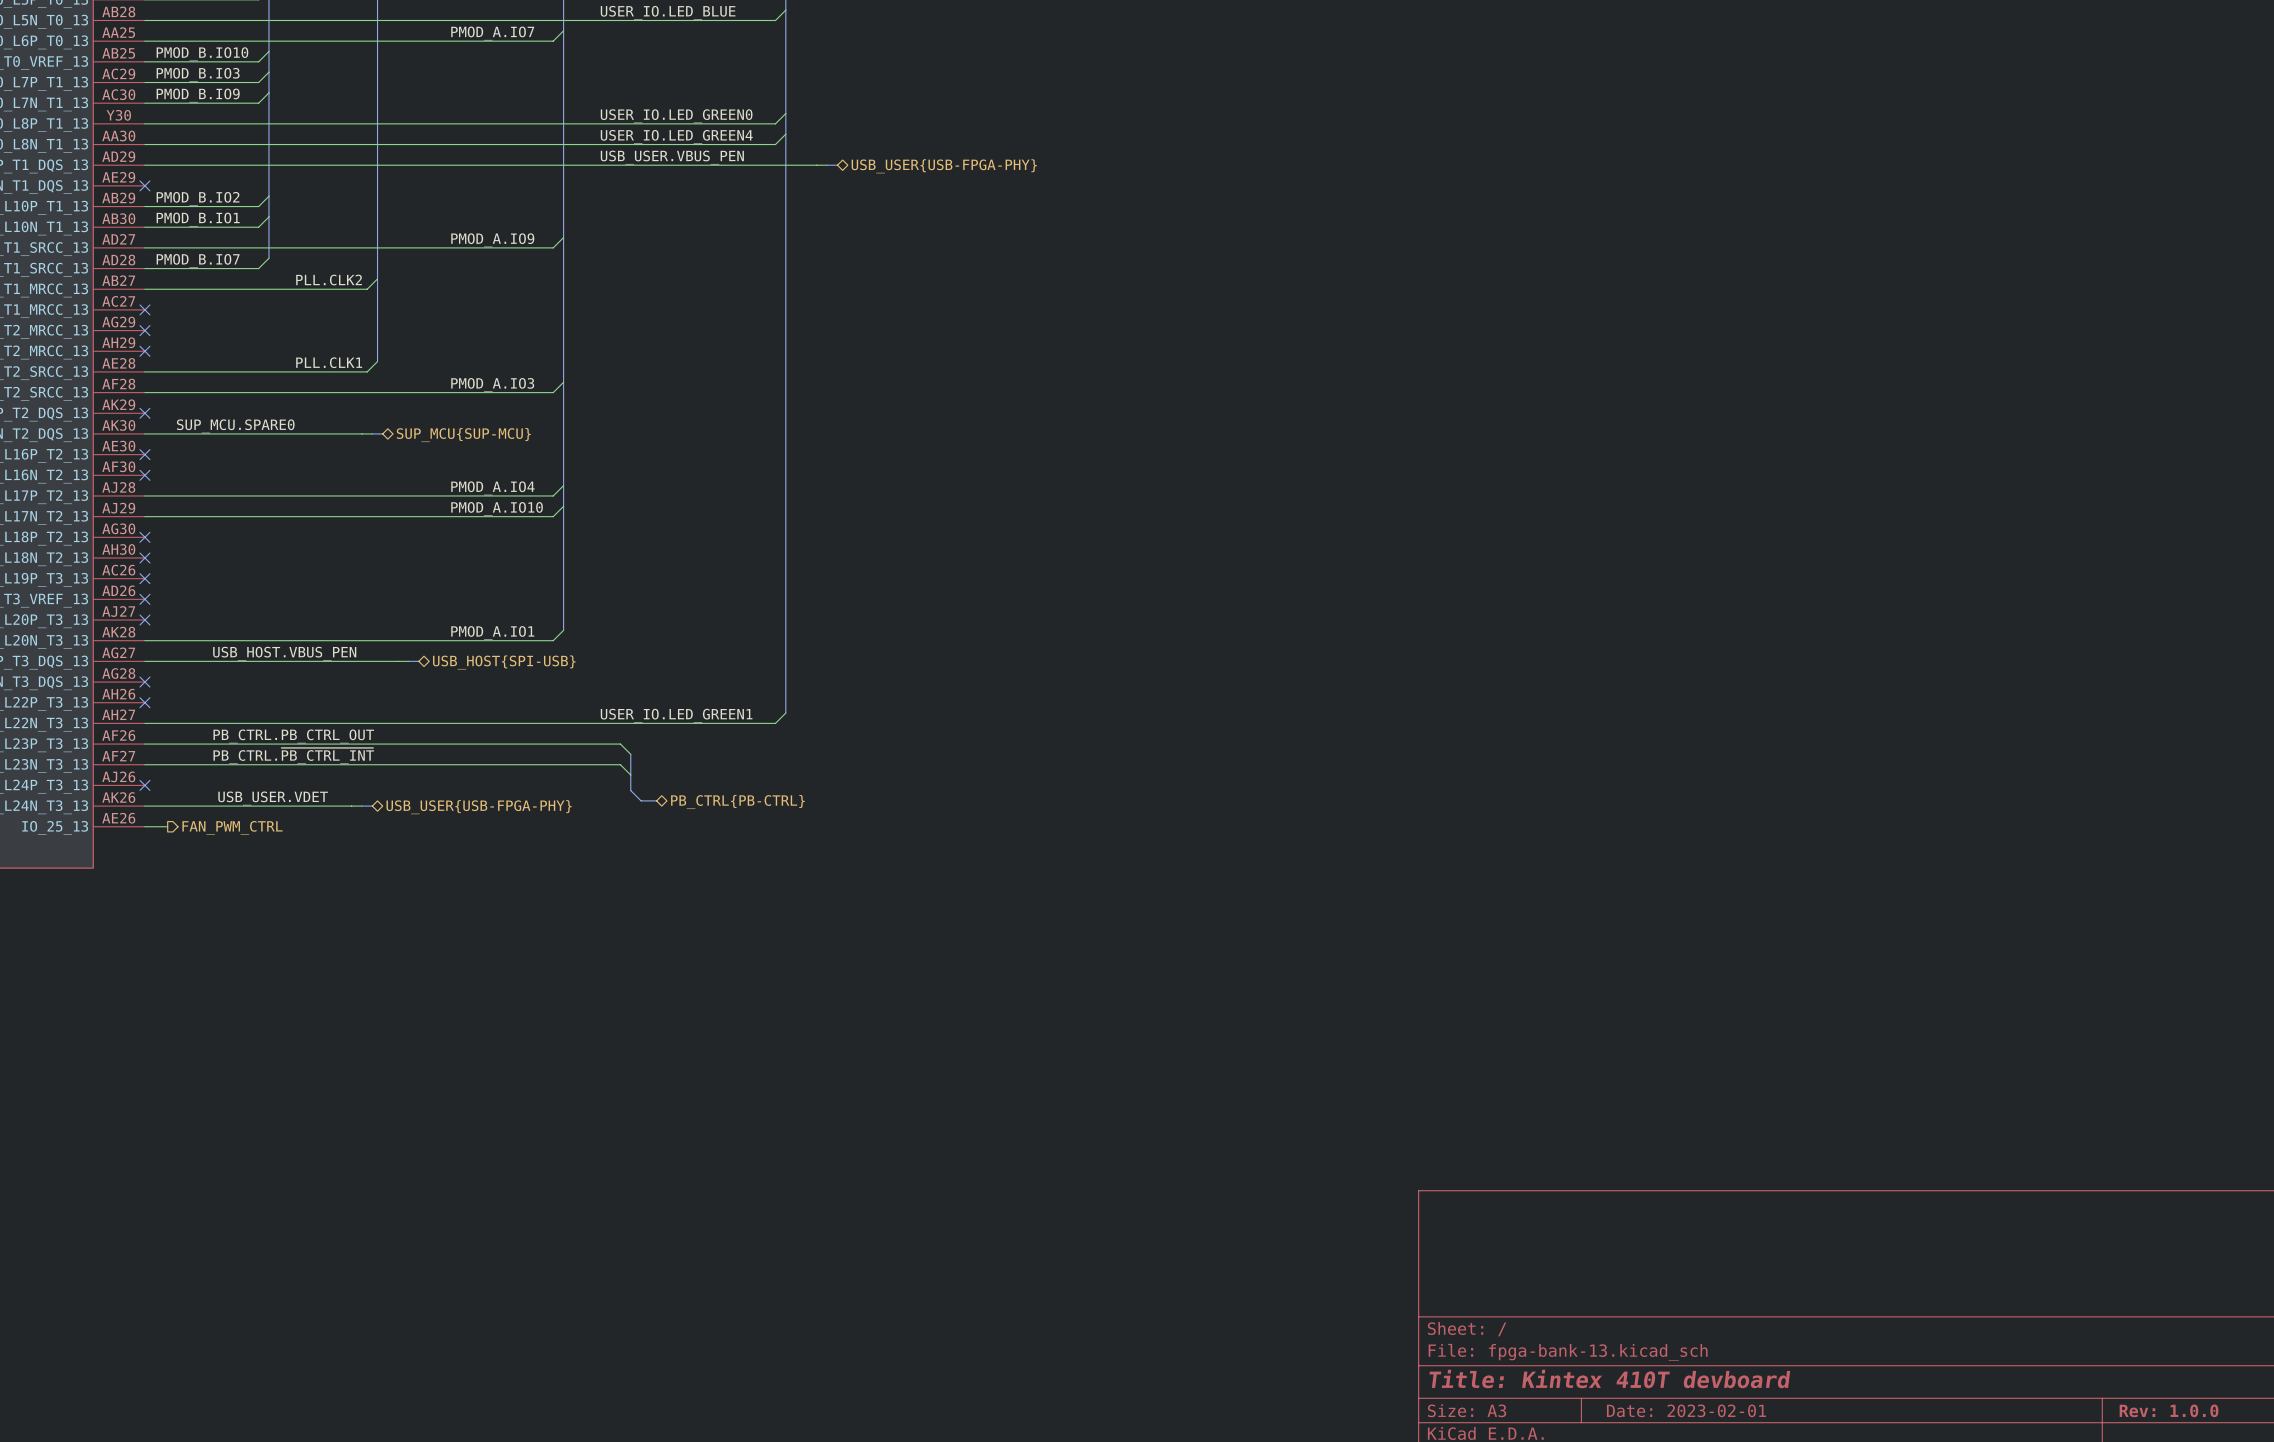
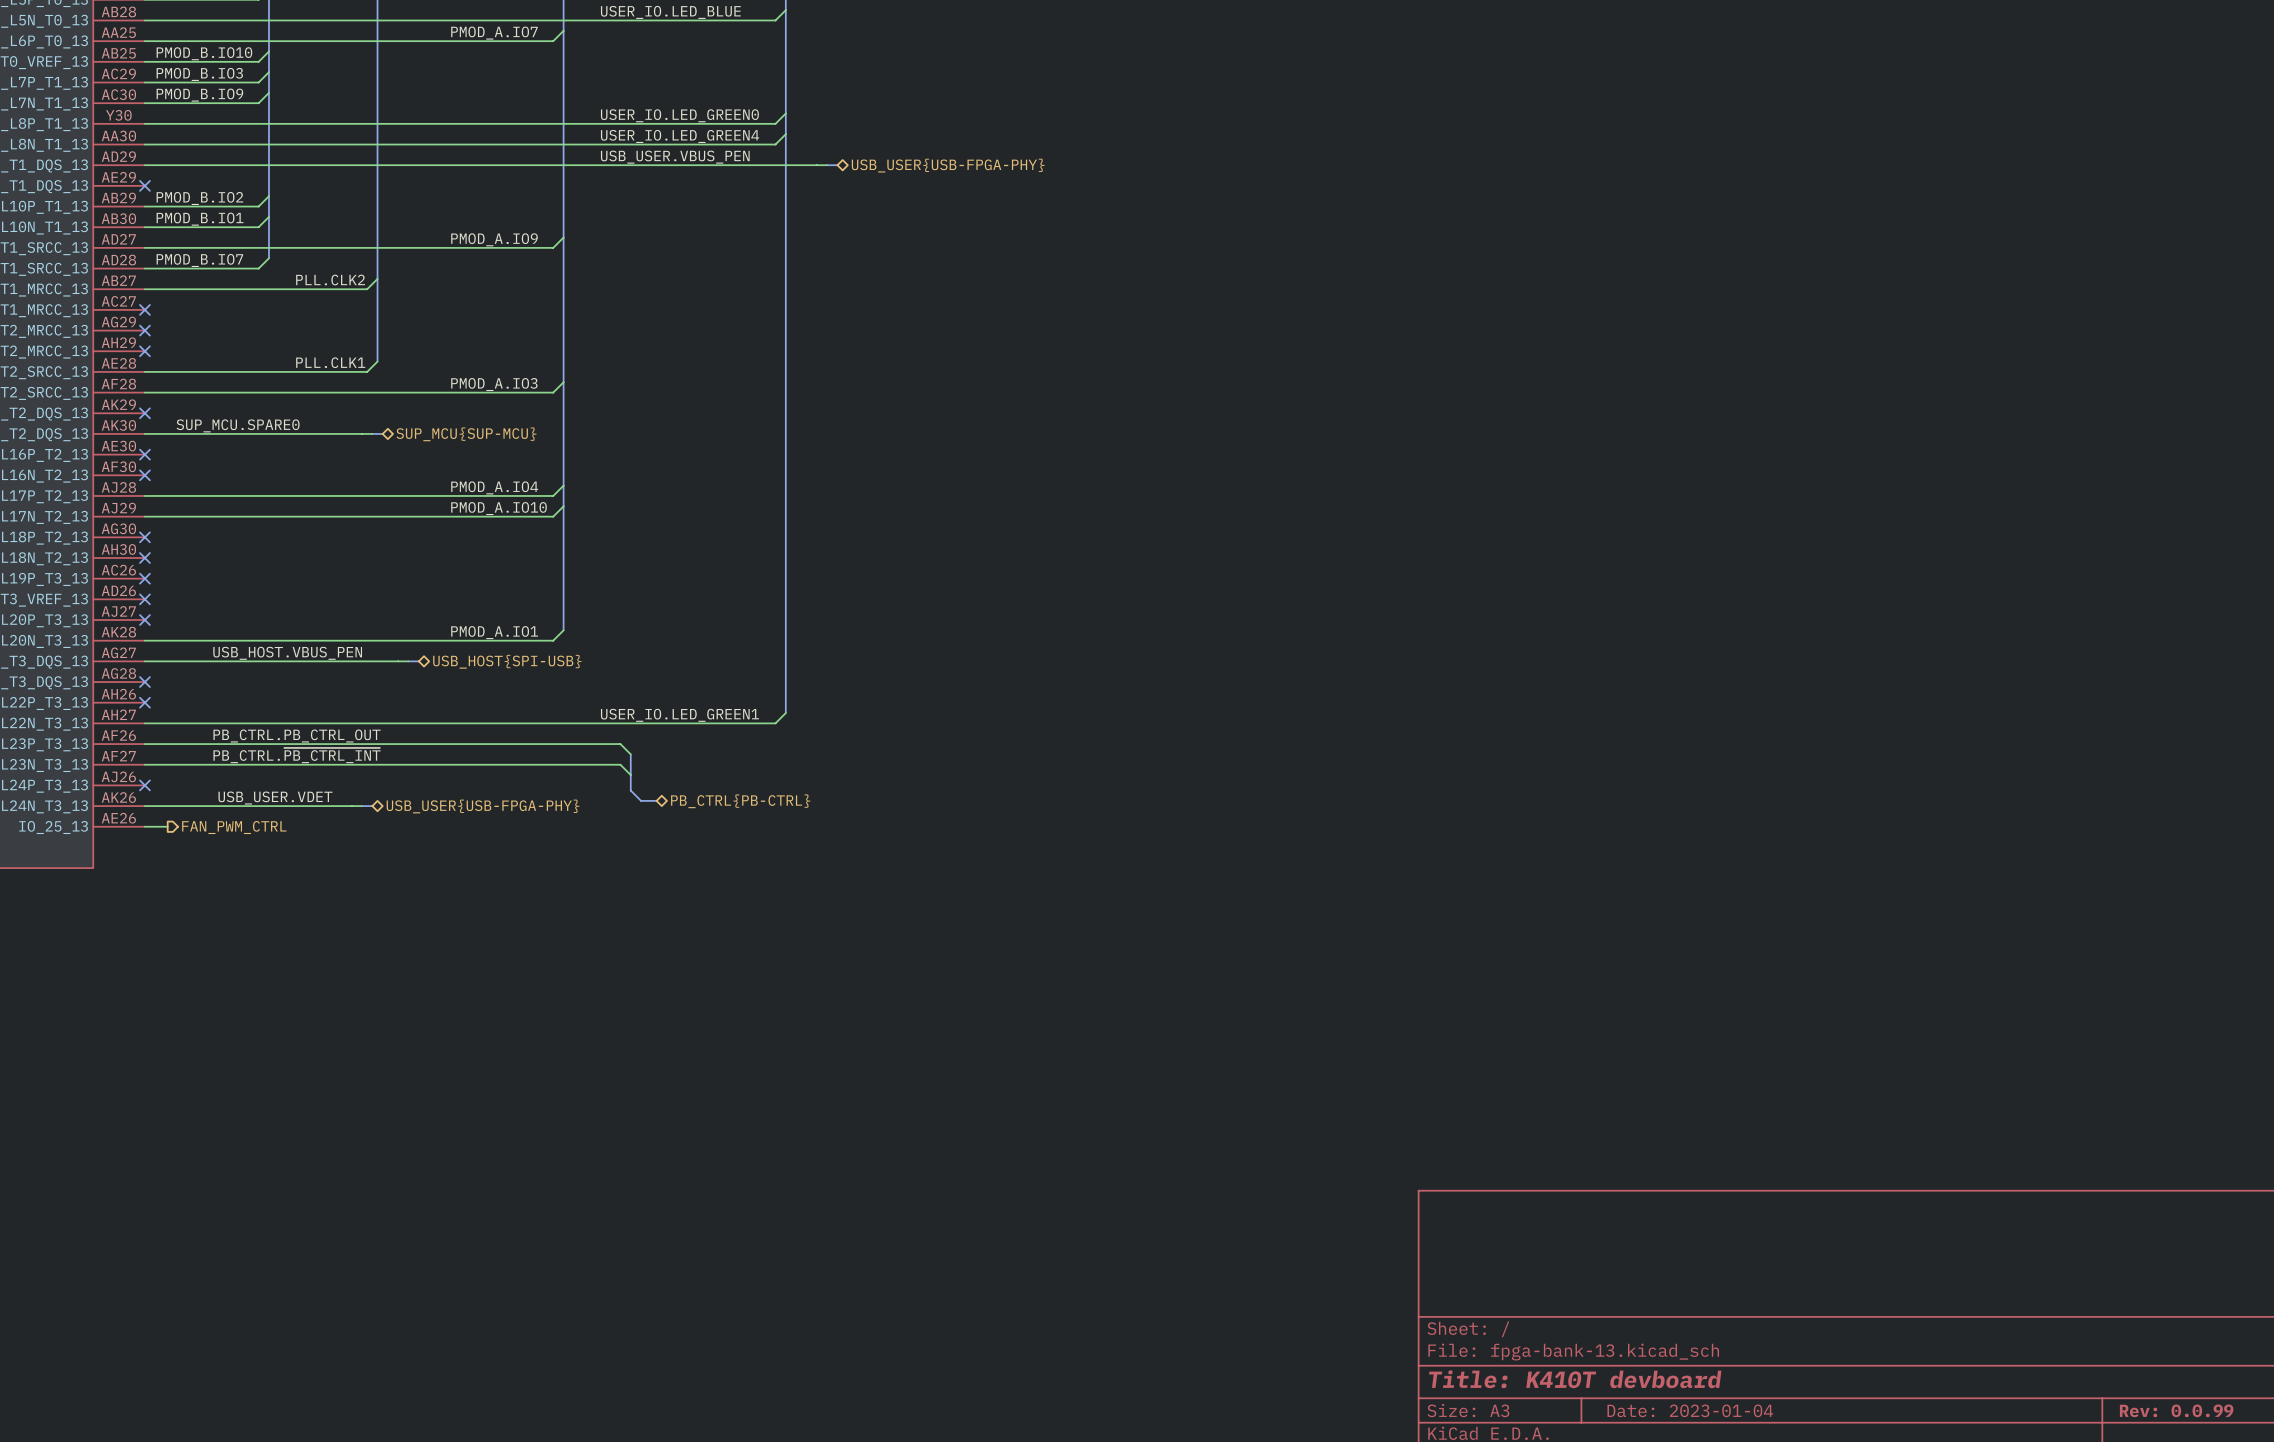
title block: Title: Kintex 410T devboard (1609, 1378) -> Title: K410T devboard (1575, 1379)
title block: Date: 2023-02-01 (1686, 1410) -> Date: 2023-01-04 (1690, 1410)
title block: Rev: 1.0.0 (2169, 1410) -> Rev: 0.0.99 (2176, 1410)

